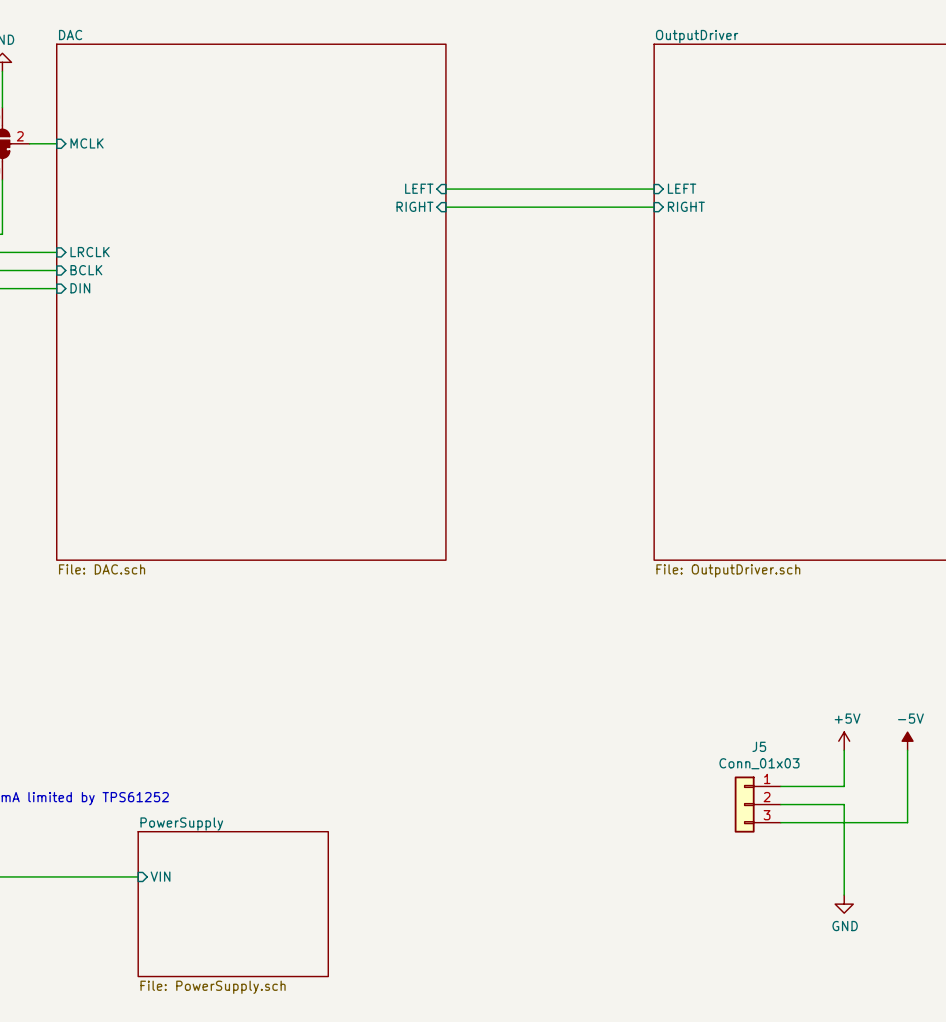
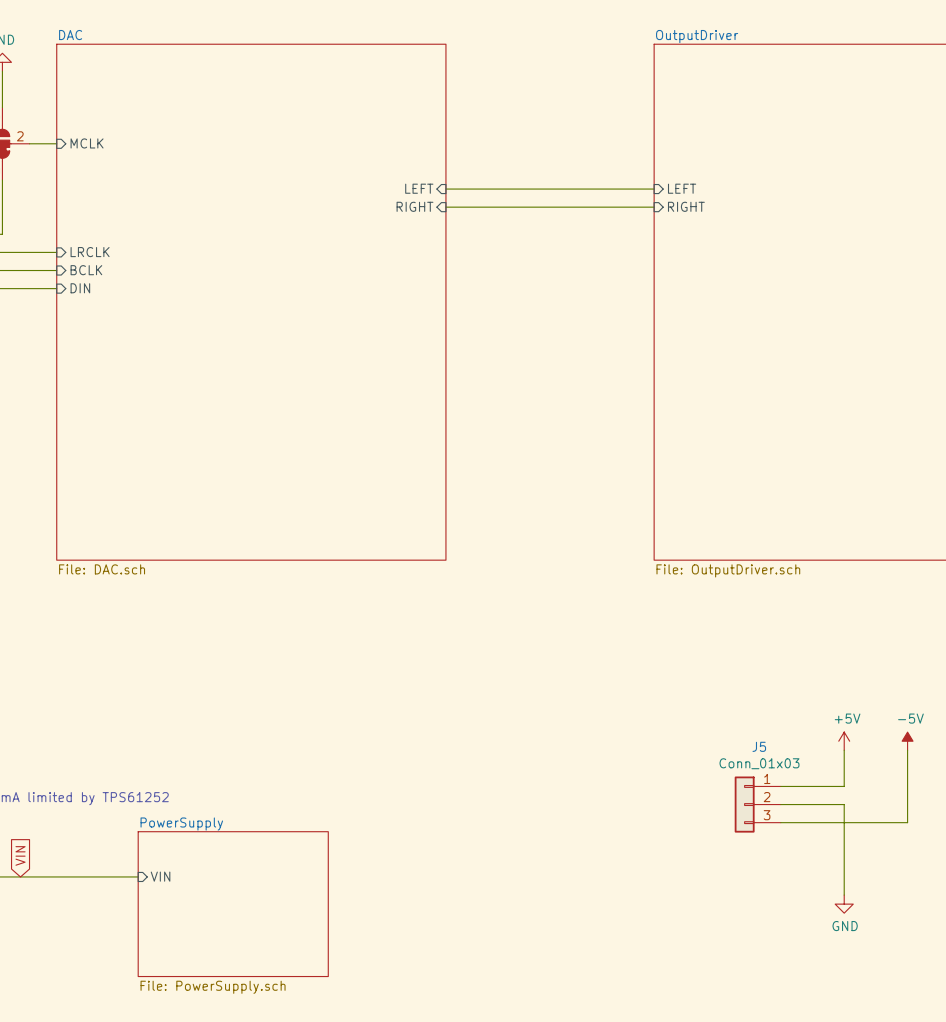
global label: none -> VIN (20, 855)

